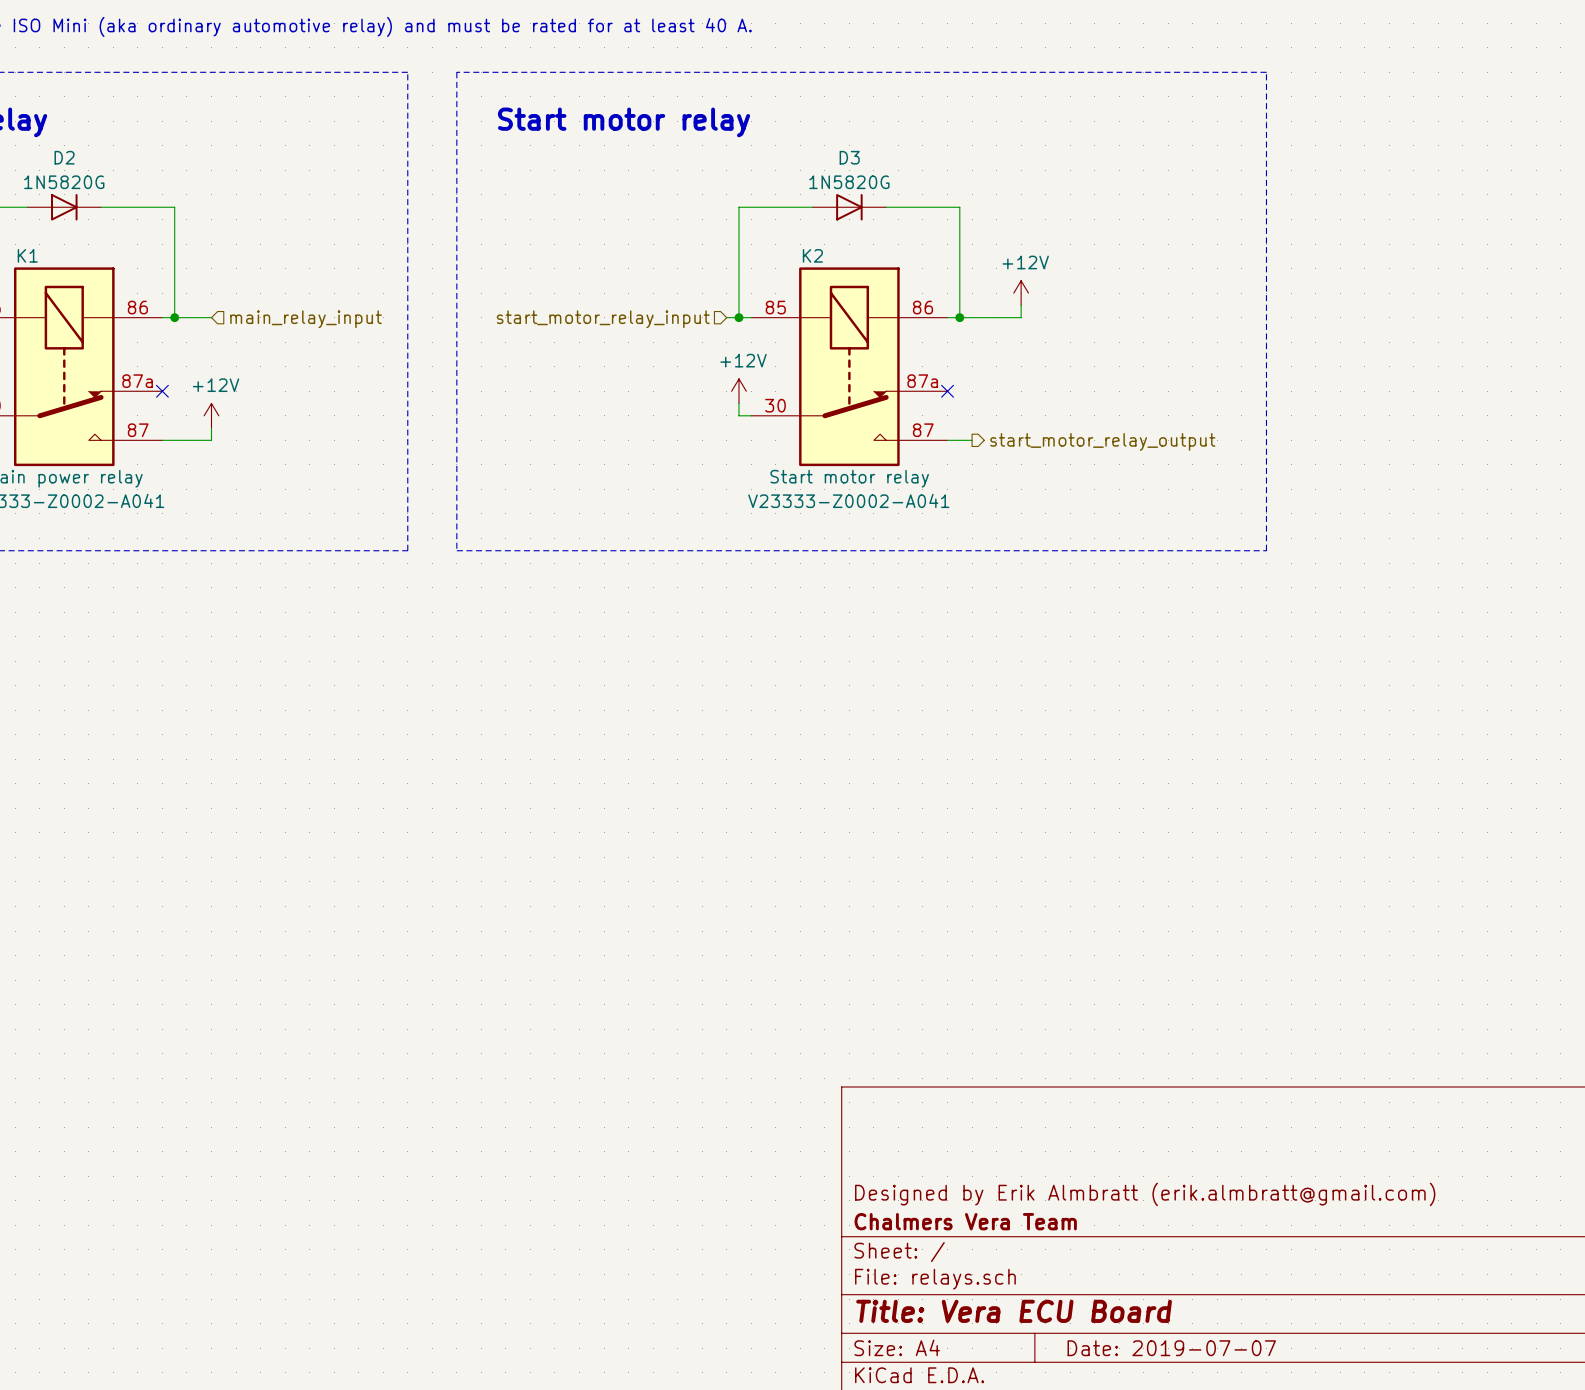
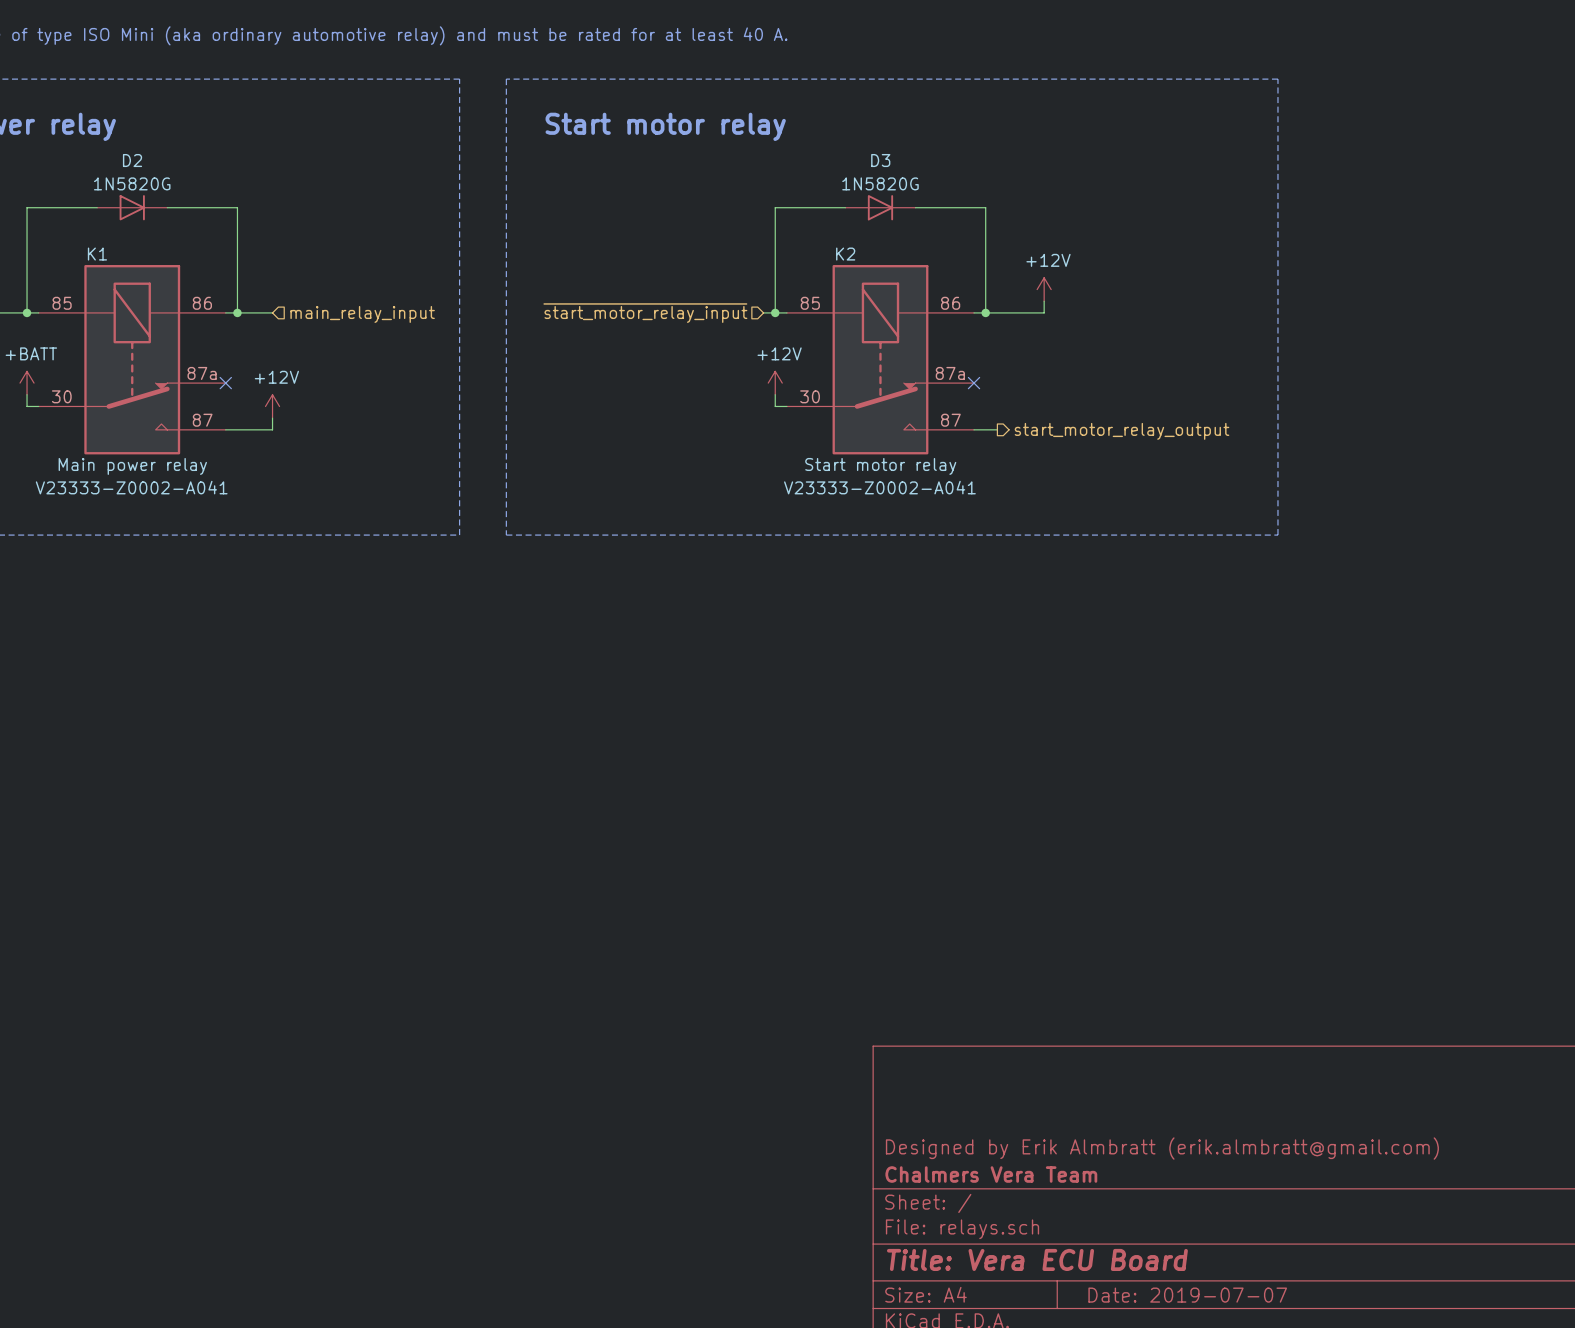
hierarchical label: start_motor_relay_input (603, 319) -> ~{start_motor_relay_input} (645, 313)

